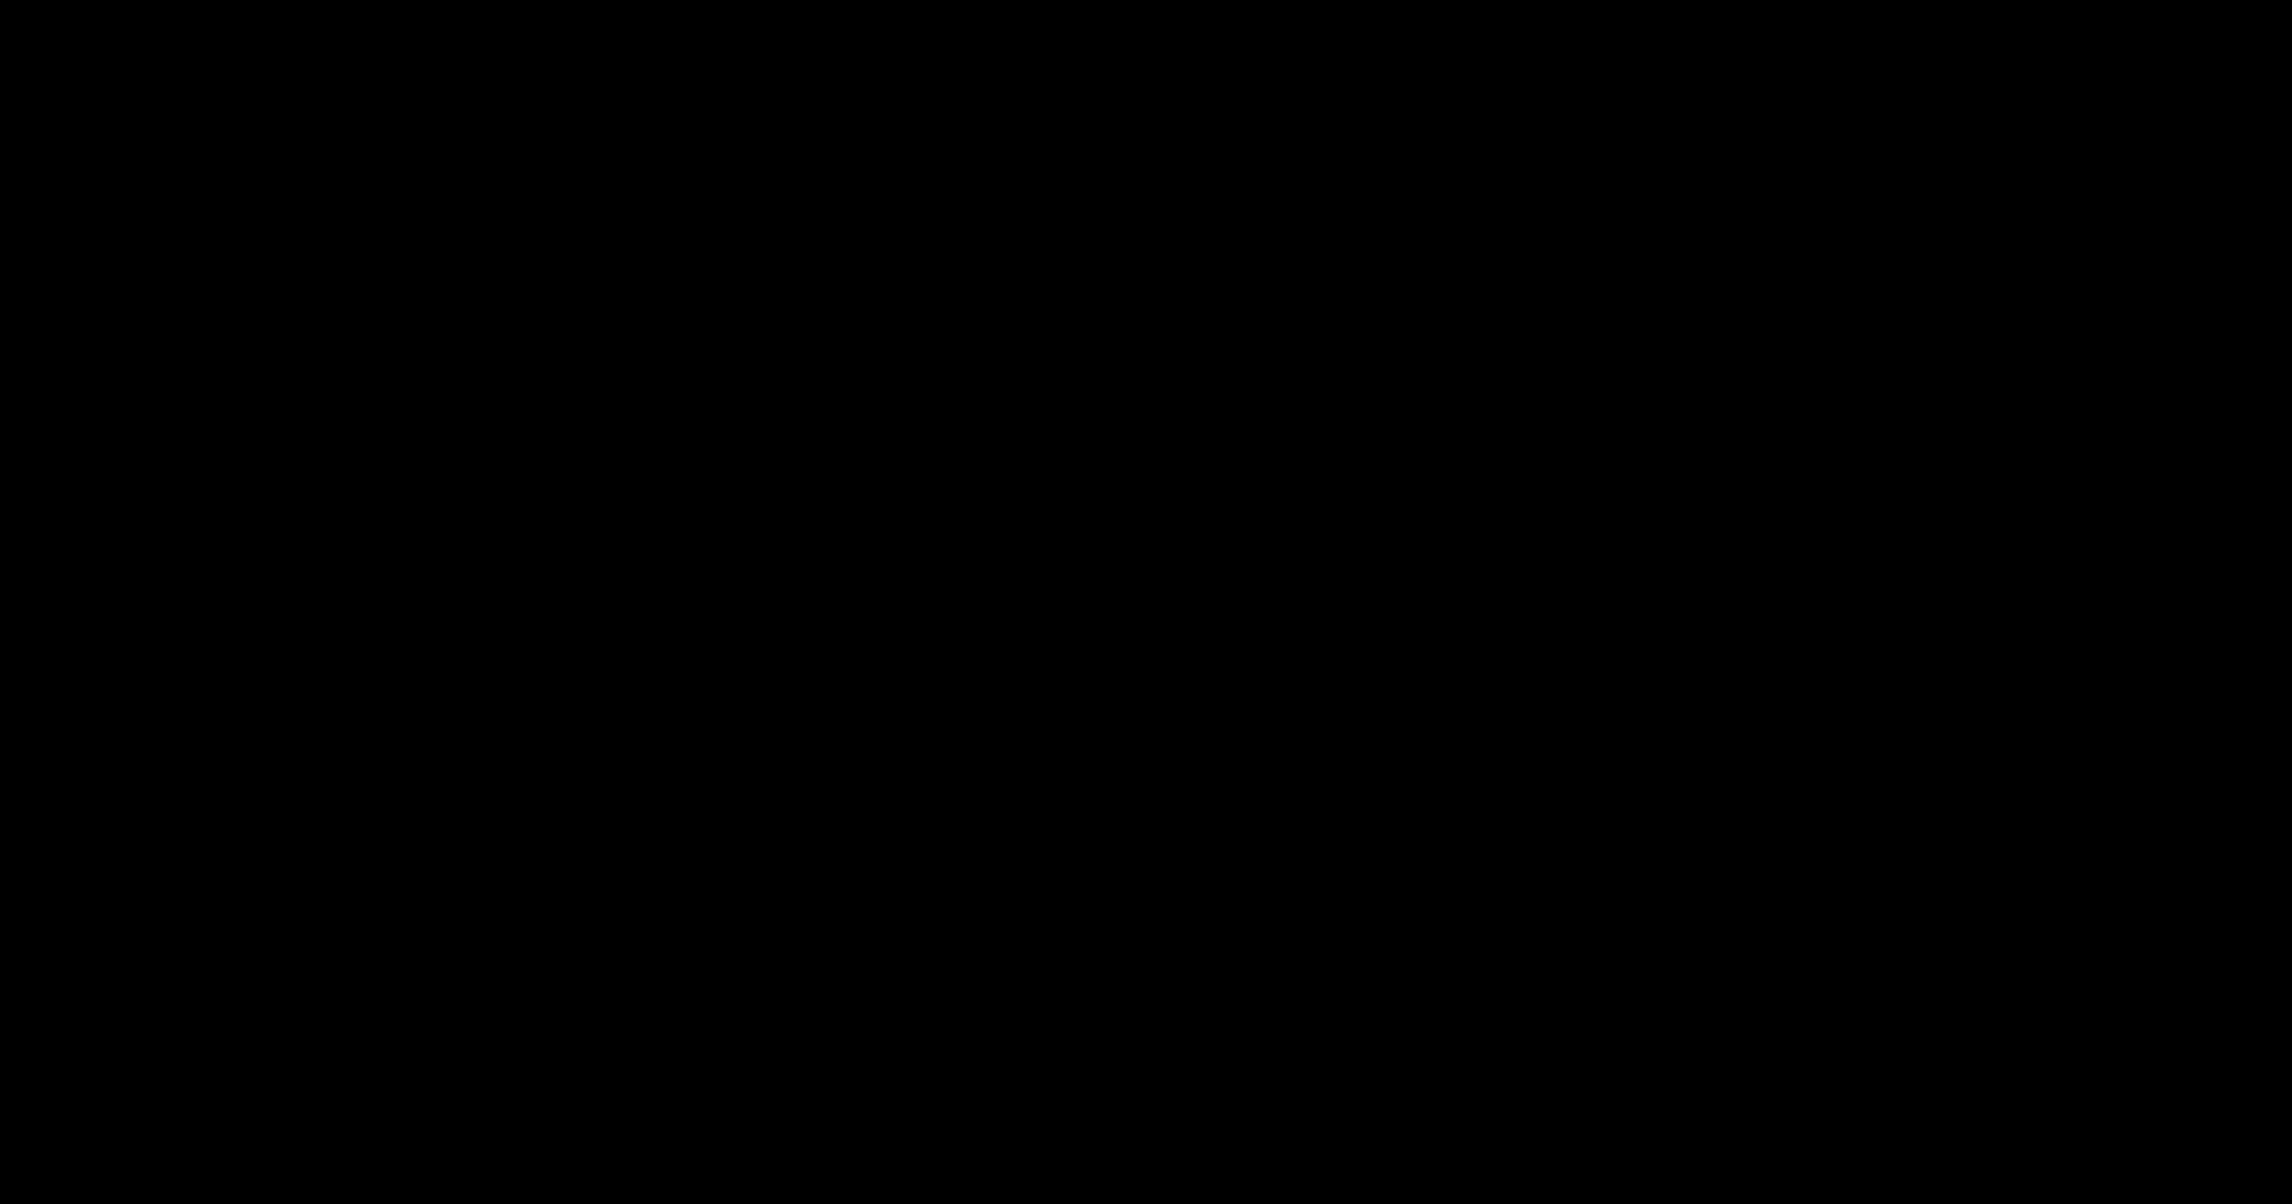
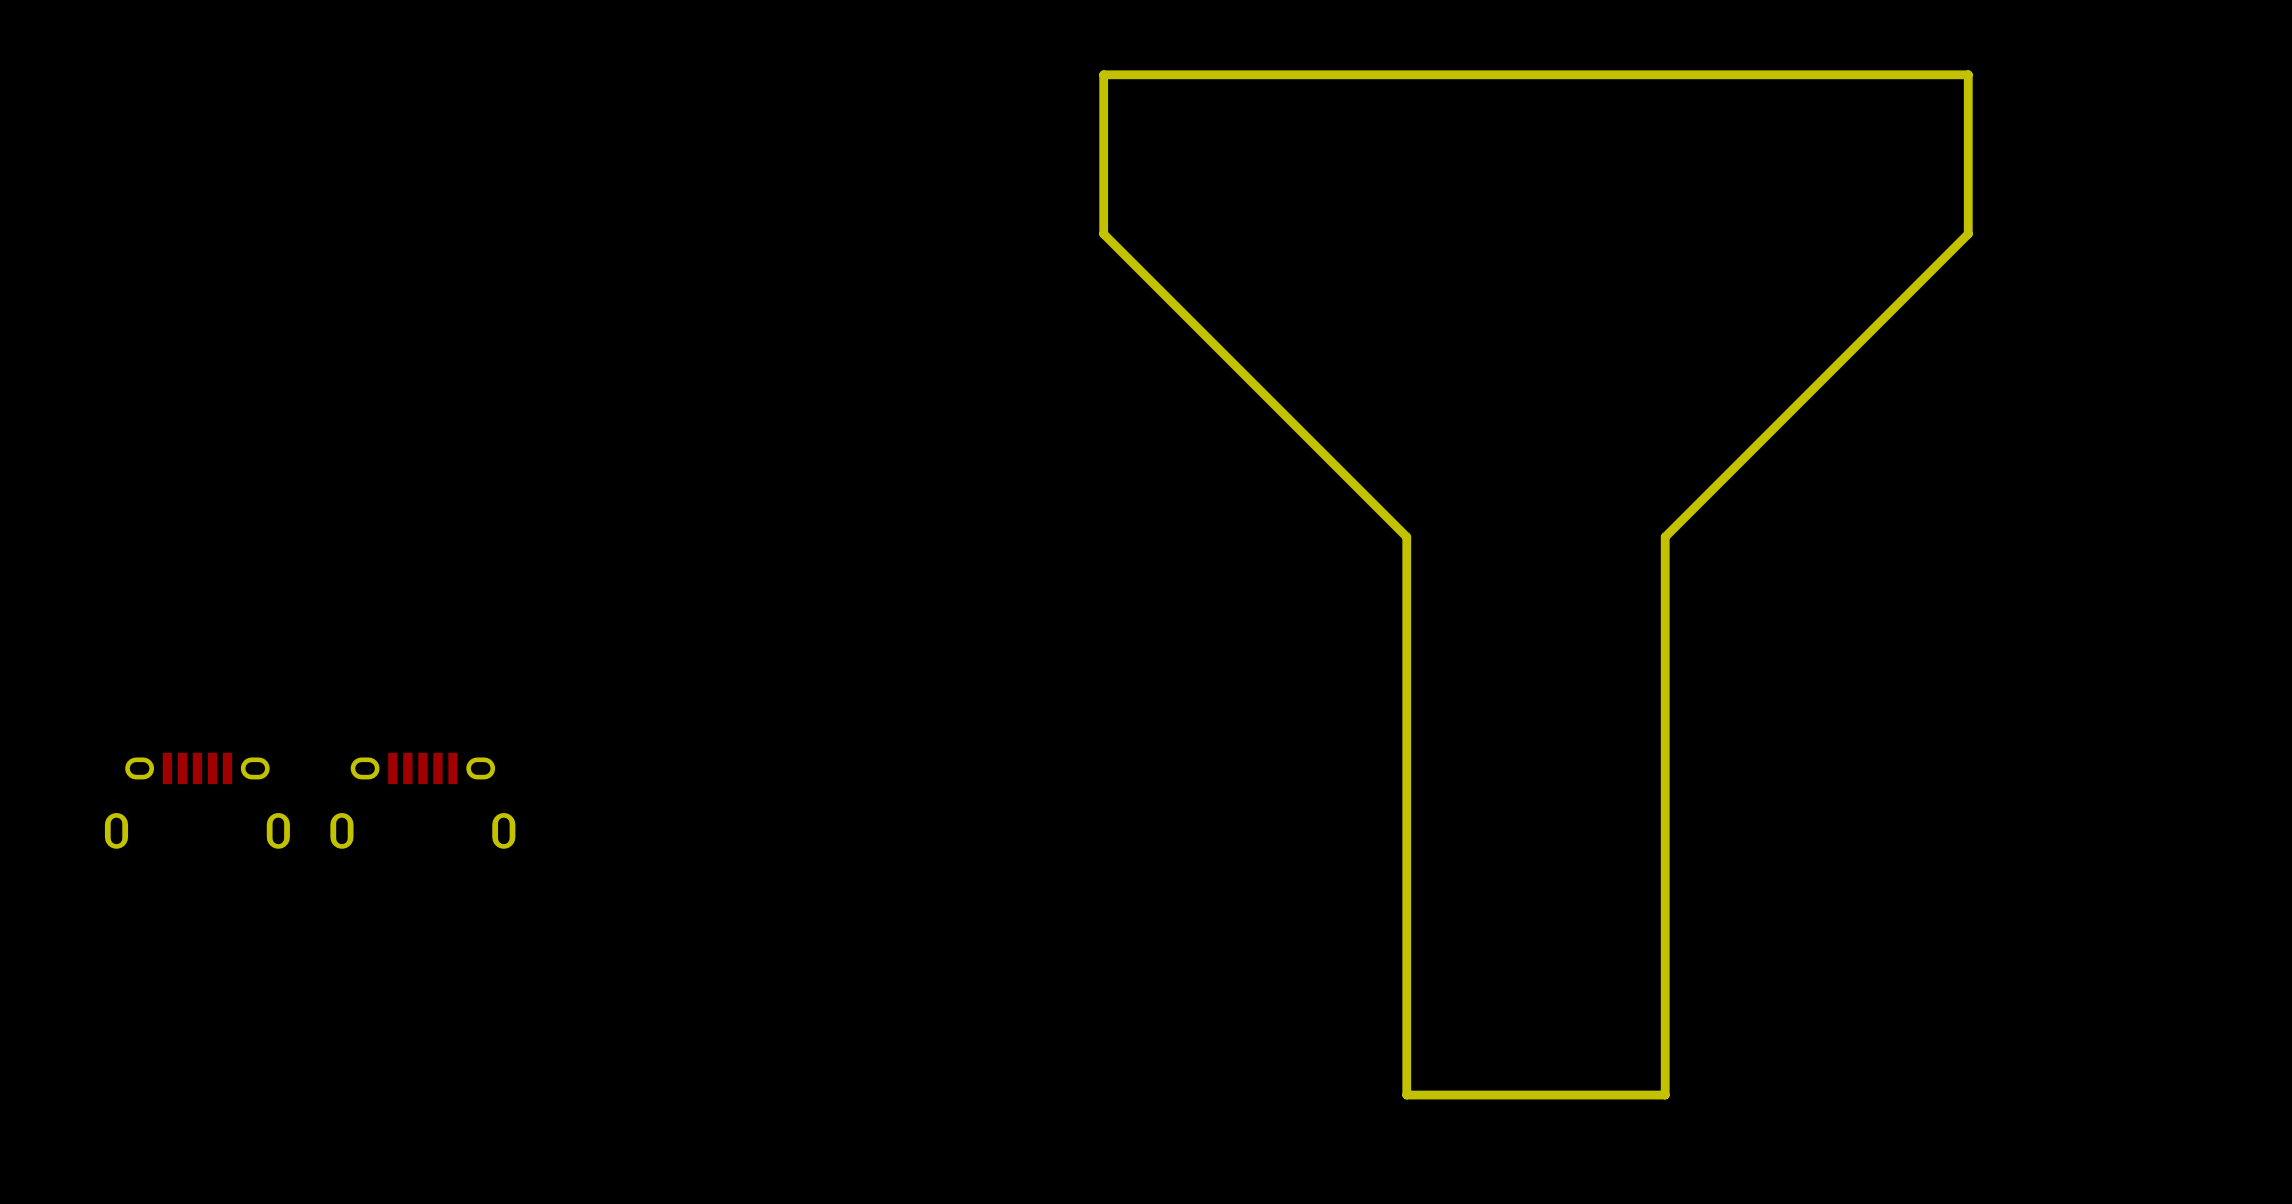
board edge: none -> (1968, 74) (1968, 233) (1665, 537) (1665, 1095) (1406, 1095) (1406, 537) (1103, 233) (1103, 74) (1968, 74)
part: none -> (197, 800)
part: none -> (422, 800)

